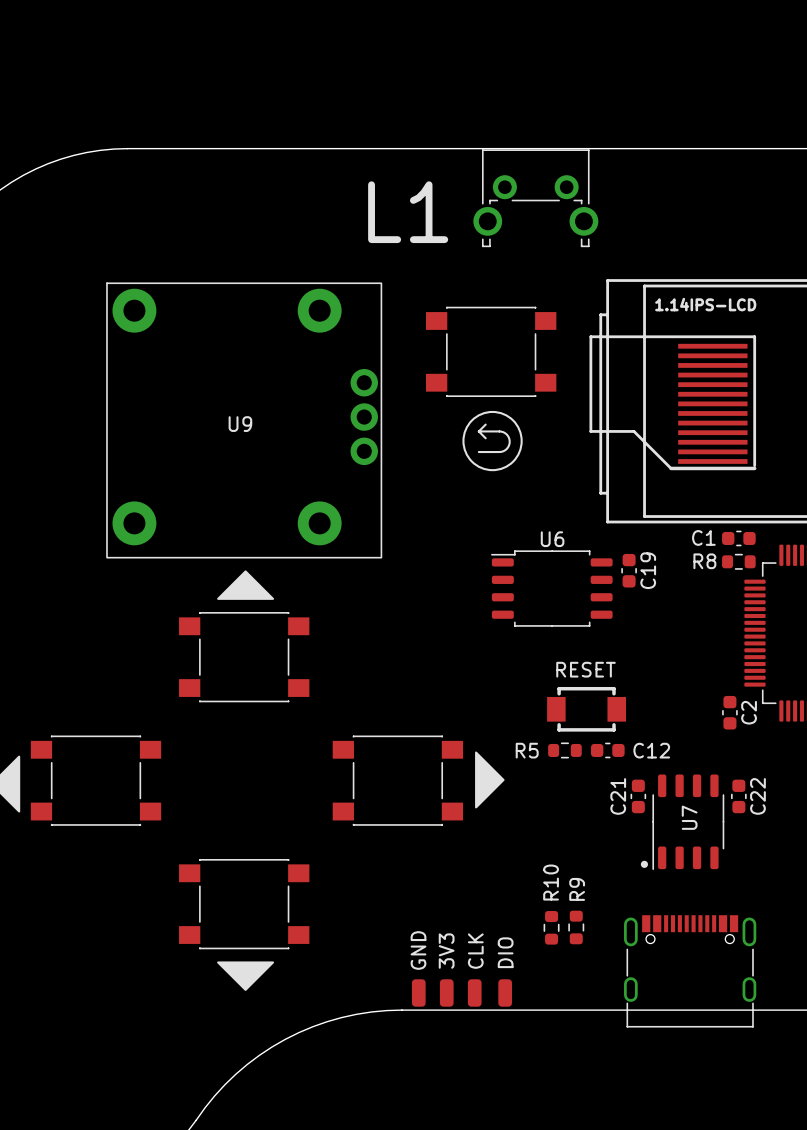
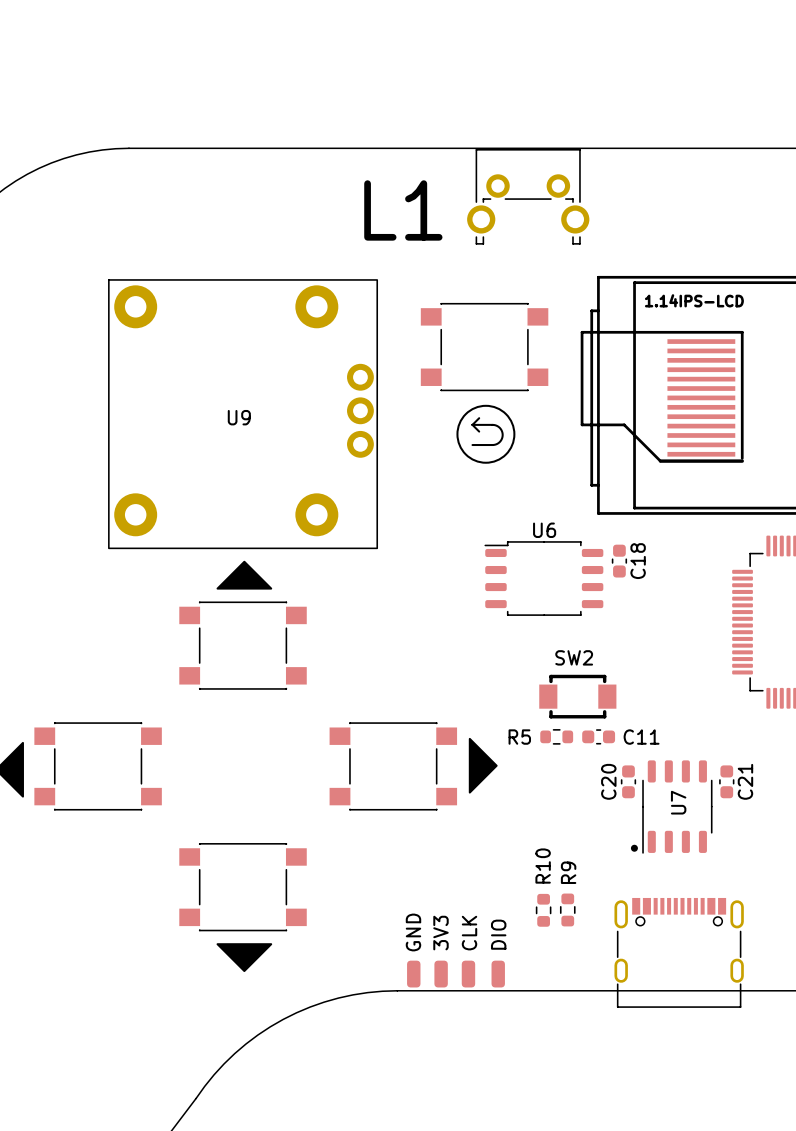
C1: (738, 538) -> none
R8: (738, 561) -> none
C19 name: C19 (648, 570) -> C18 (638, 561)
RESET name: RESET (586, 669) -> SW2 (574, 657)
C2: (729, 712) -> none
C12 name: C12 (651, 750) -> C11 (641, 737)
C21 name: C21 (618, 796) -> C20 (608, 781)
C22 name: C22 (757, 796) -> C21 (745, 781)

